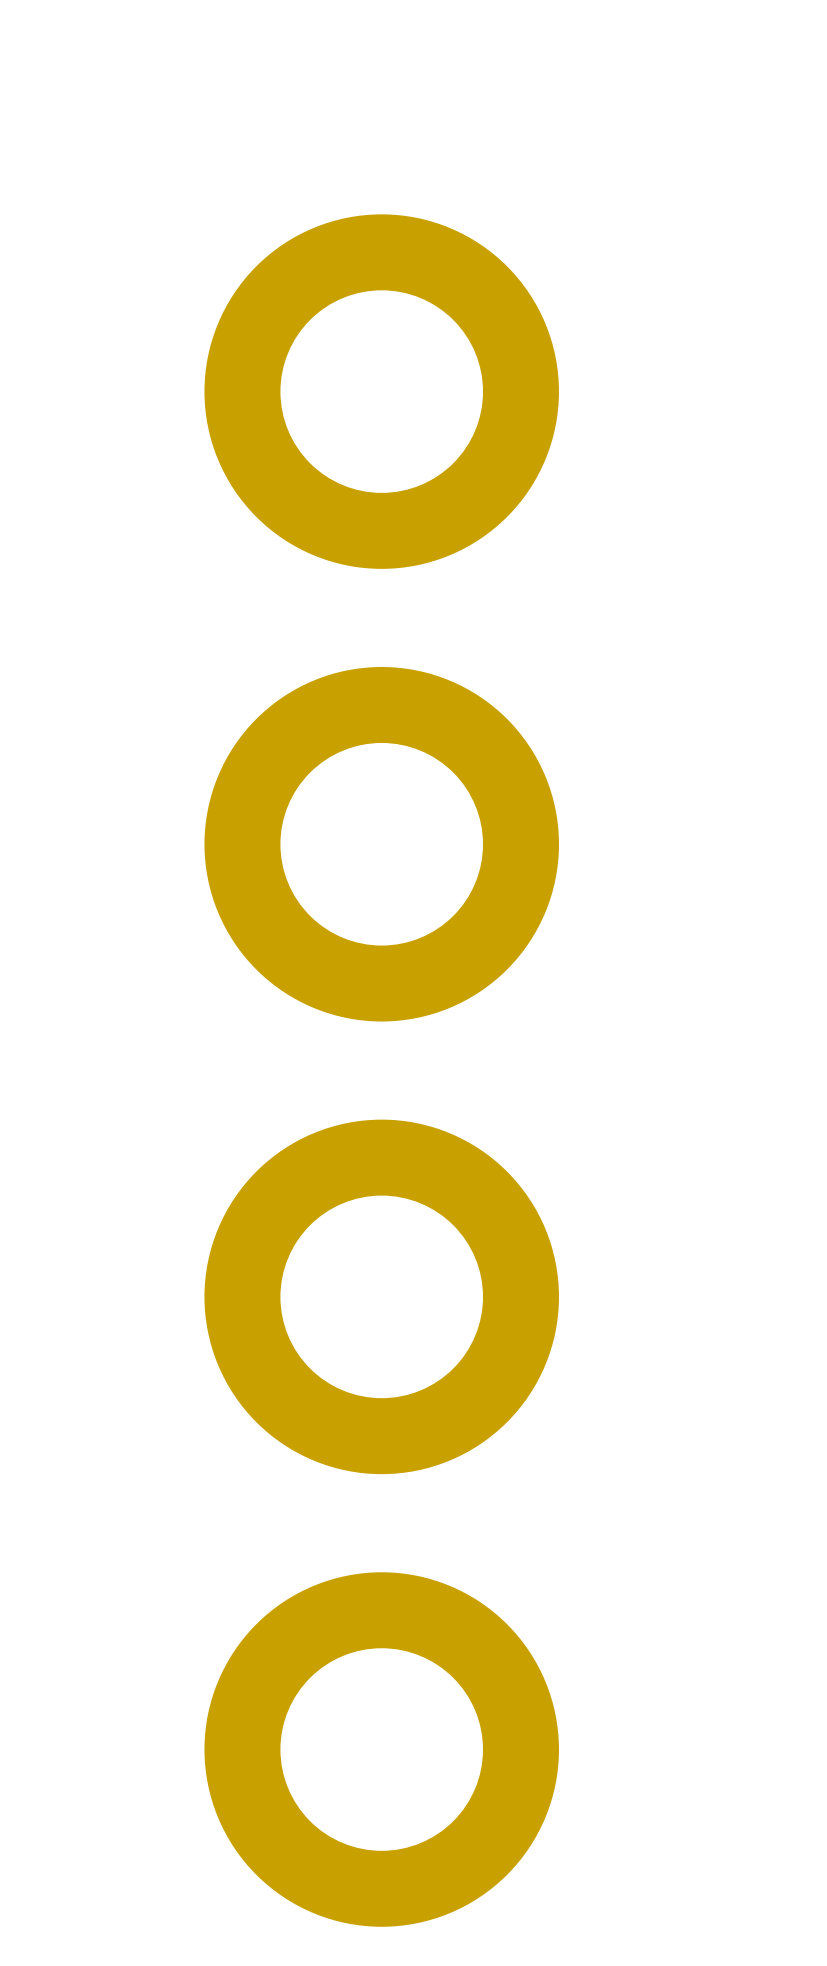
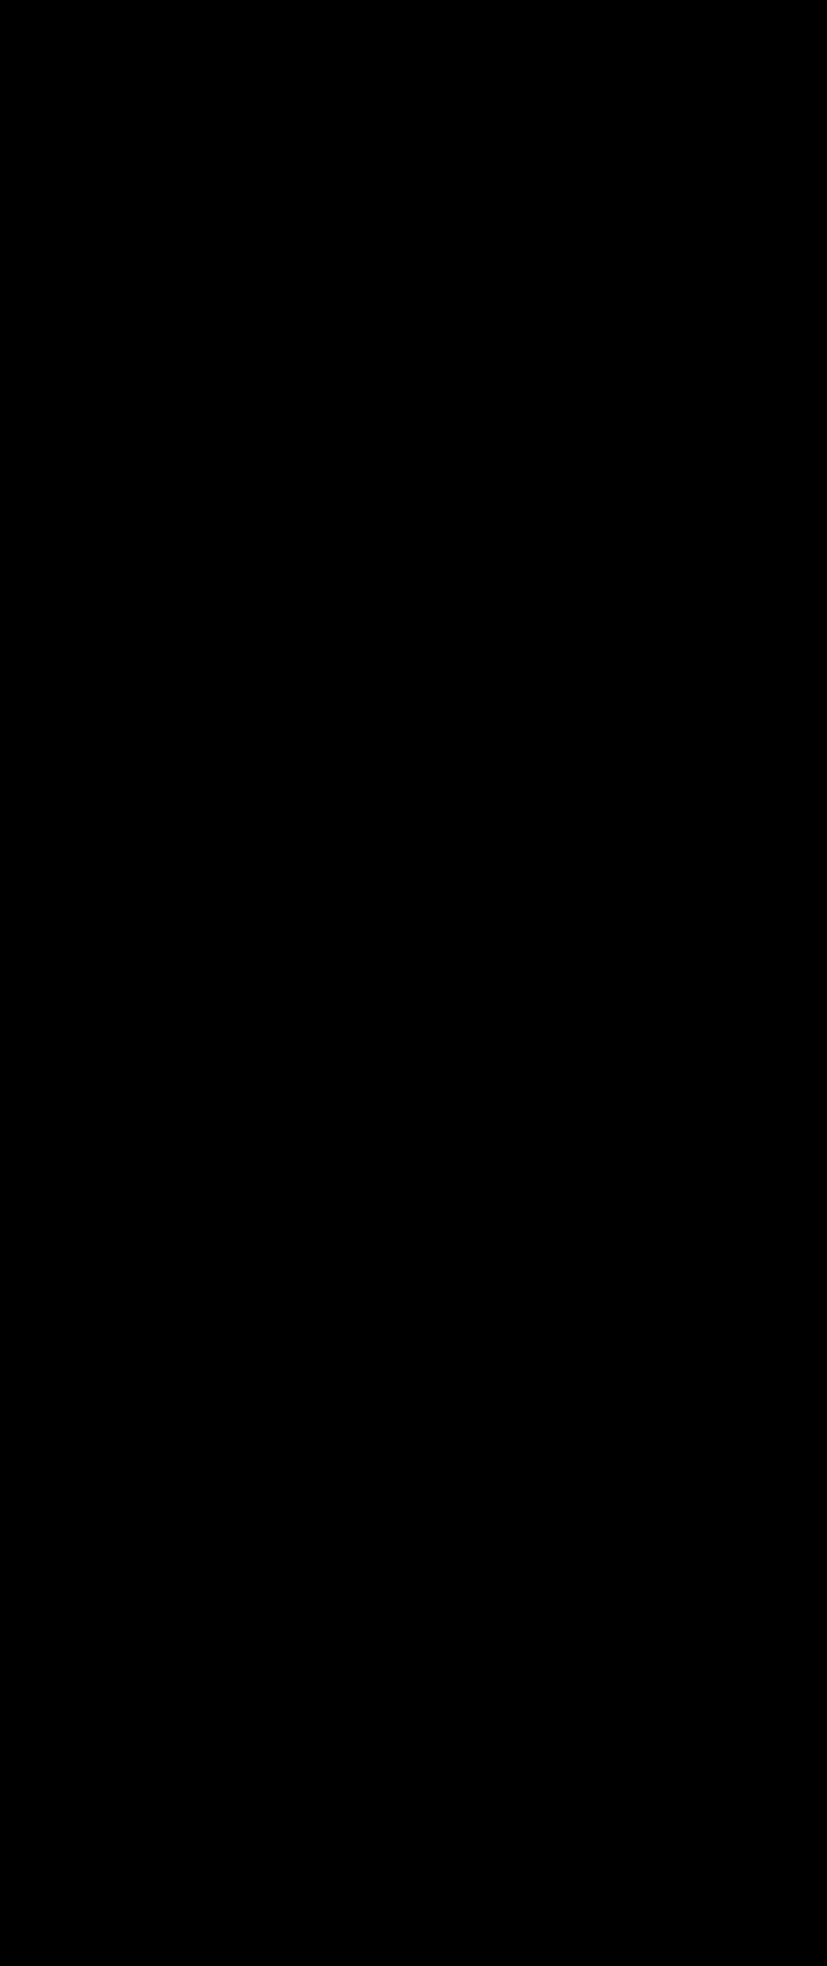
part: (381, 391) -> none
part: (381, 844) -> none
part: (381, 1296) -> none
part: (381, 1749) -> none

